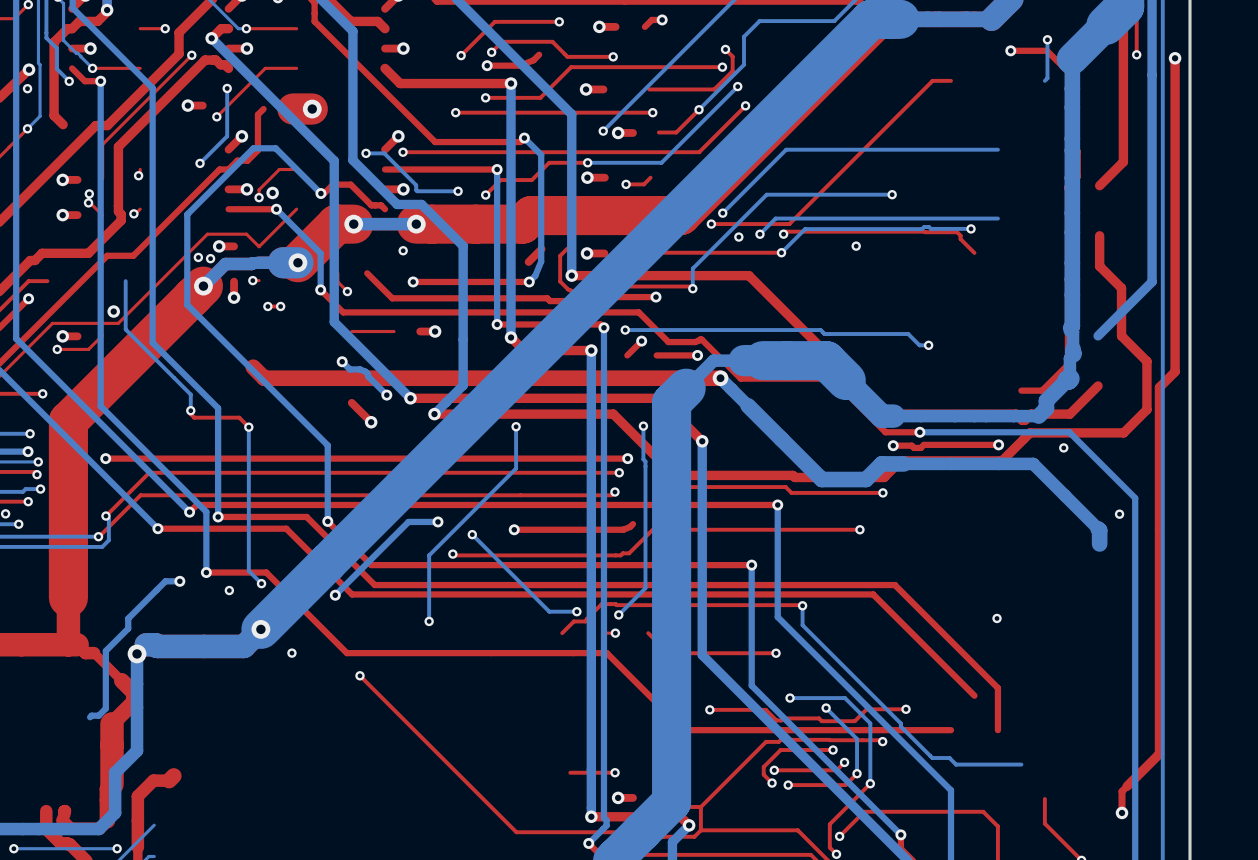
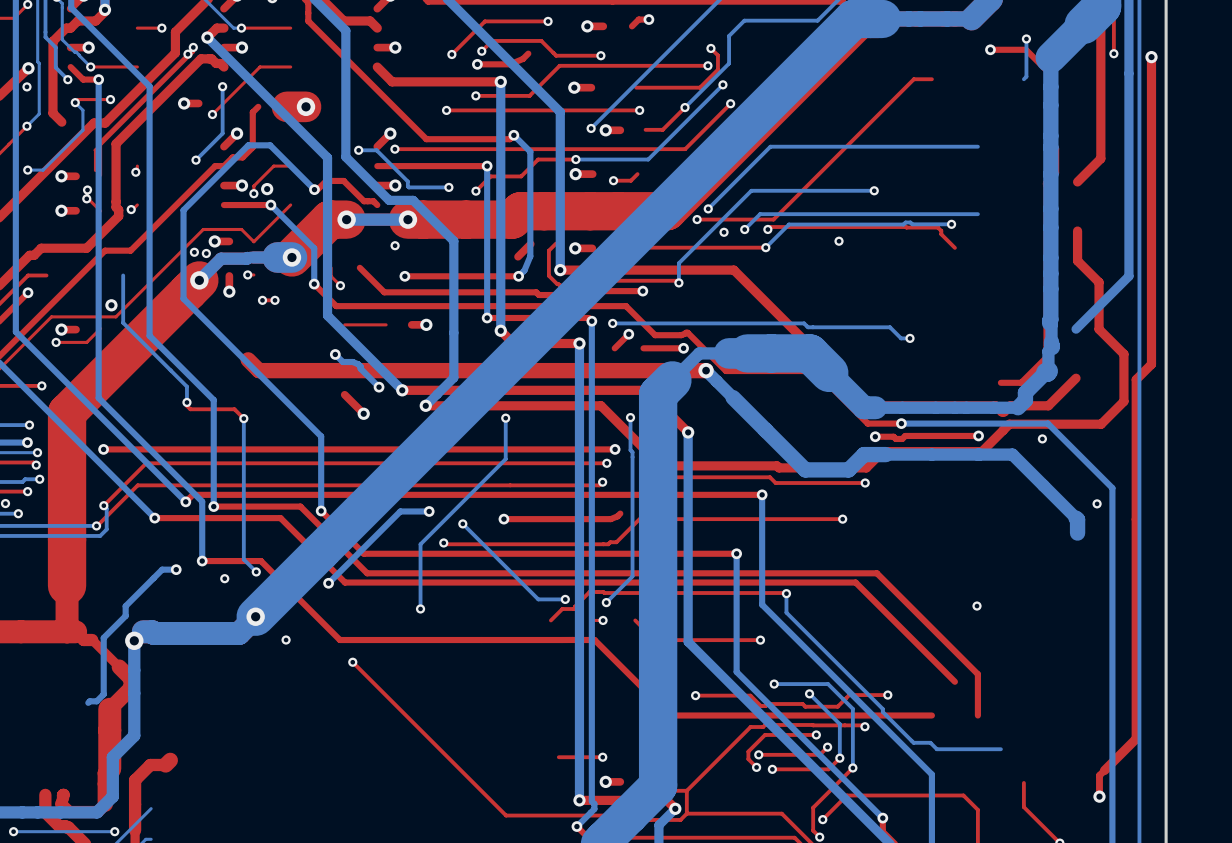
top track: none -> (193, 47) (193, 52) (95, 150) (95, 170)
via: none -> (193, 47)
top track: none -> (110, 99) (78, 99) (75, 102)
via: none -> (110, 99)
bottom track: none -> (75, 102) (82, 110) (82, 130) (43, 170) (27, 170)
via: none -> (75, 102)
via: none -> (27, 170)

